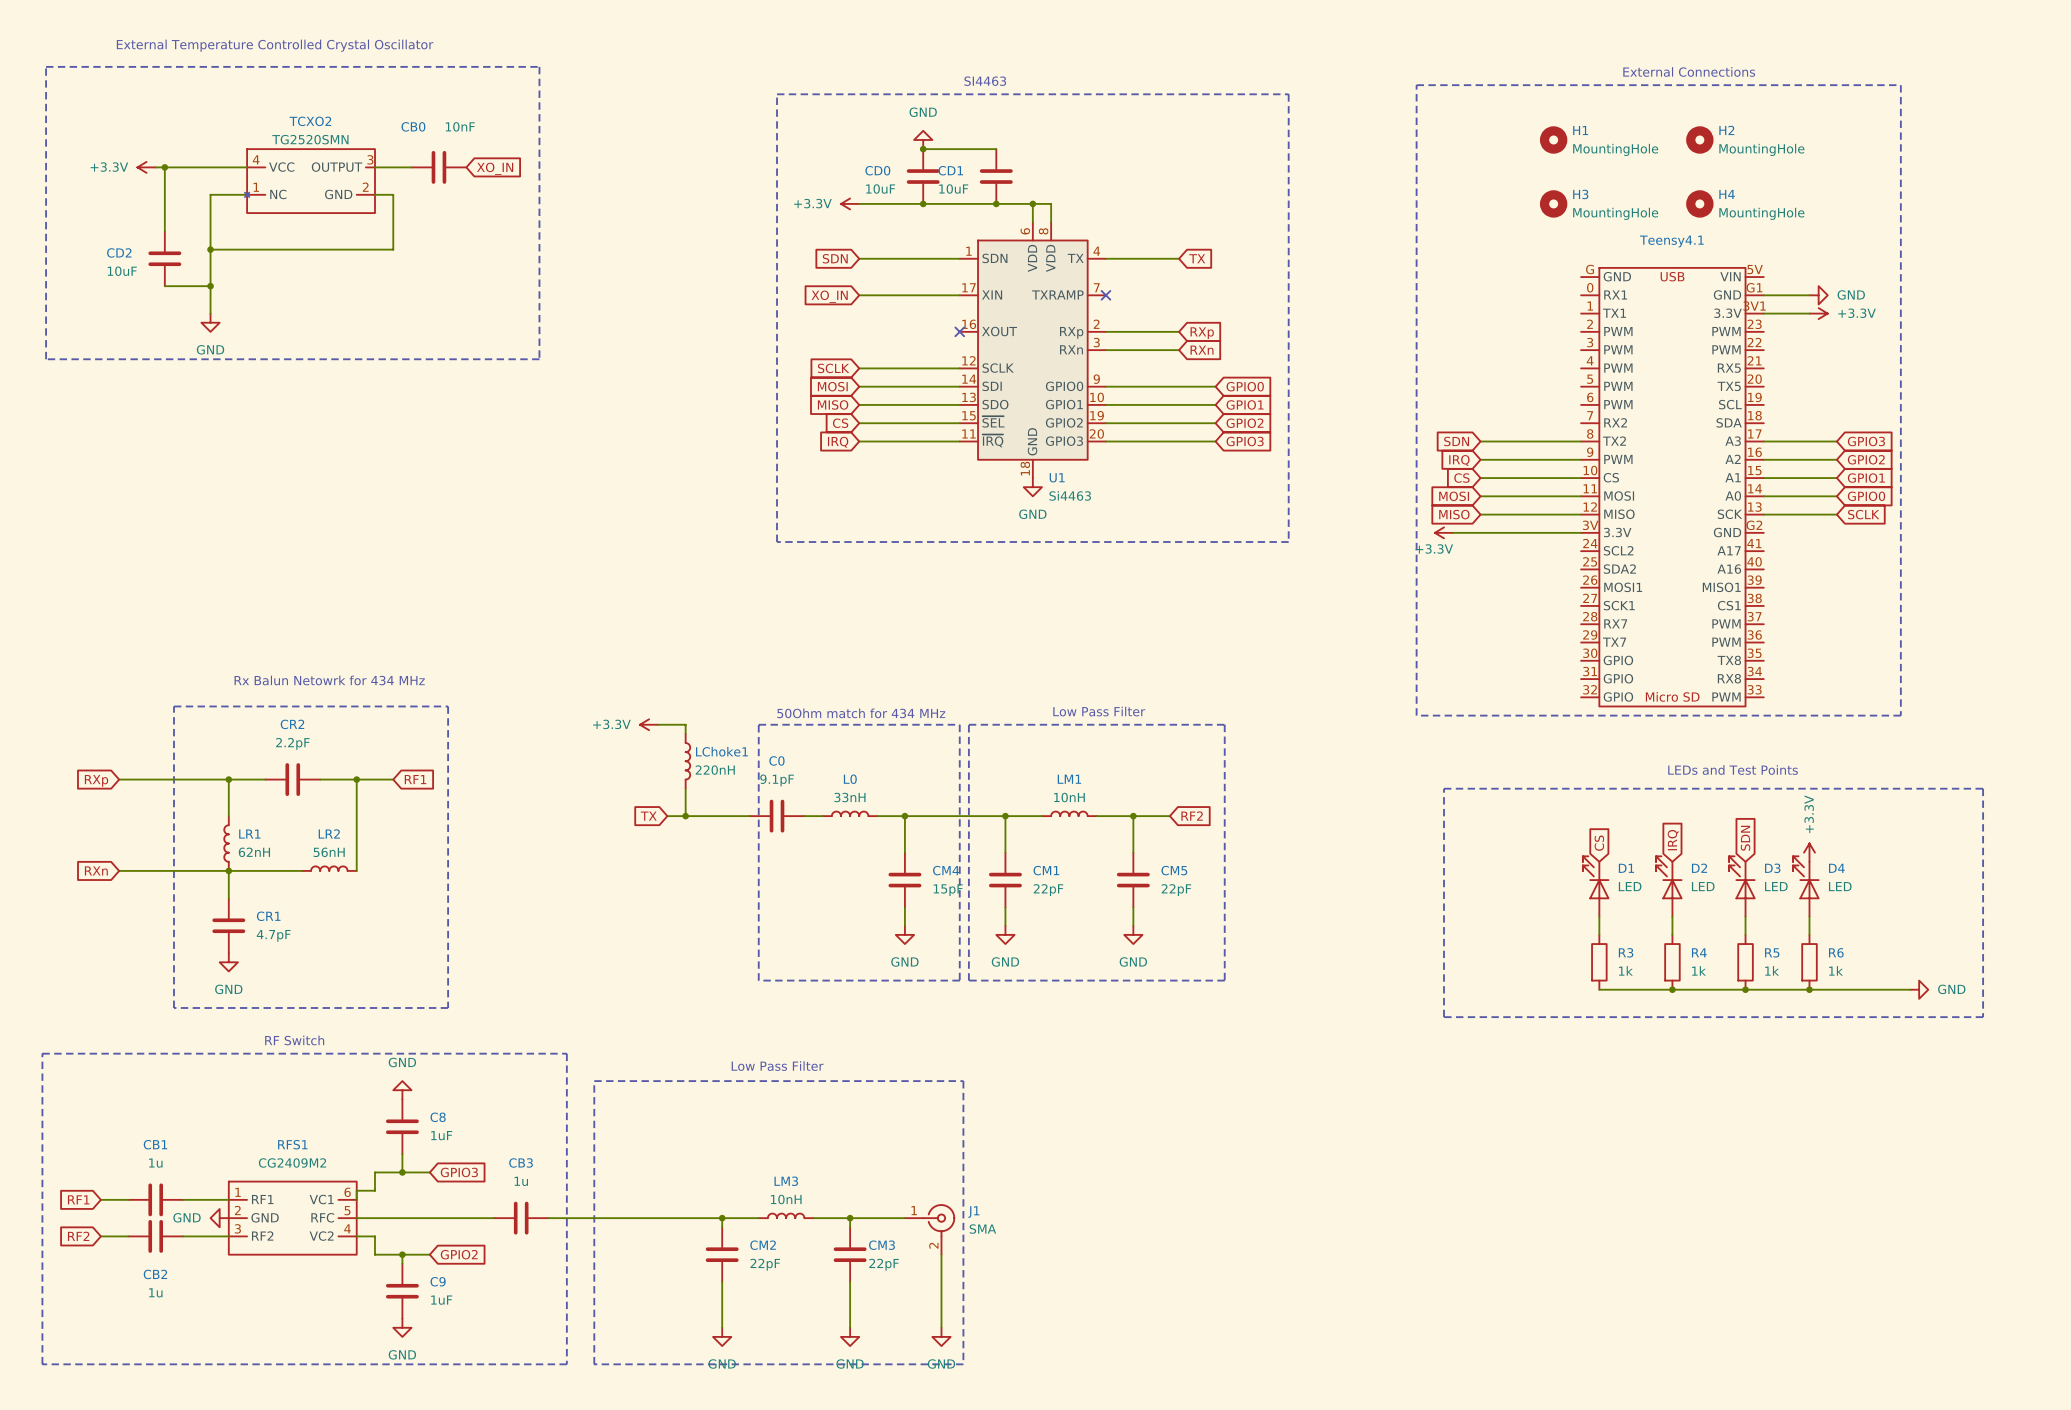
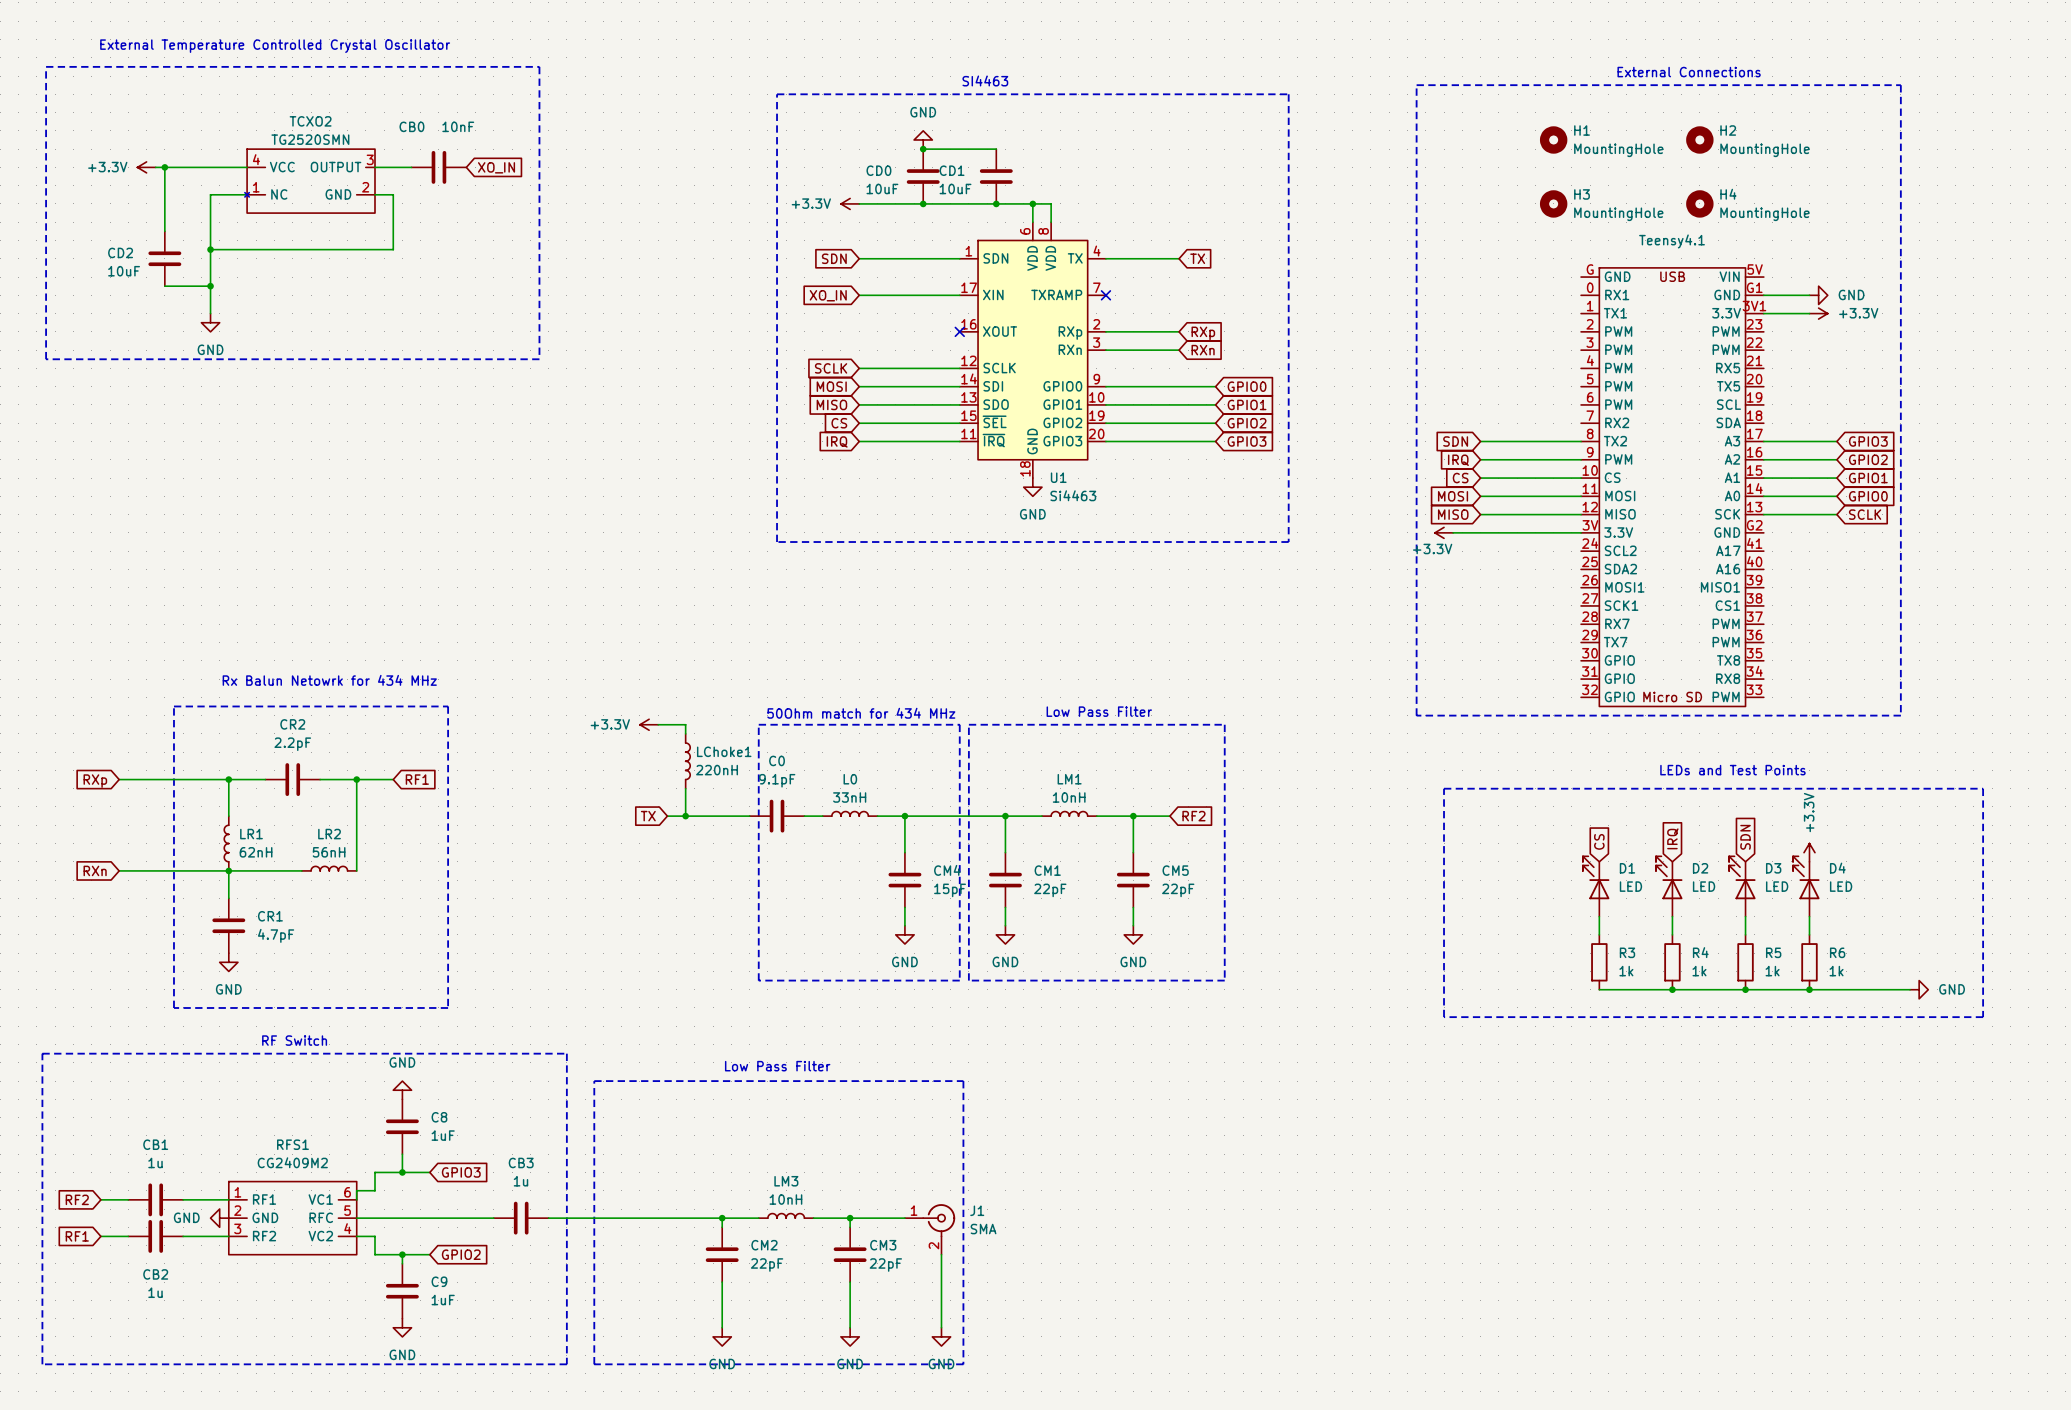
global label: RF1 (78, 1199) -> RF2 (77, 1199)
global label: RF2 (78, 1236) -> RF1 (77, 1236)

